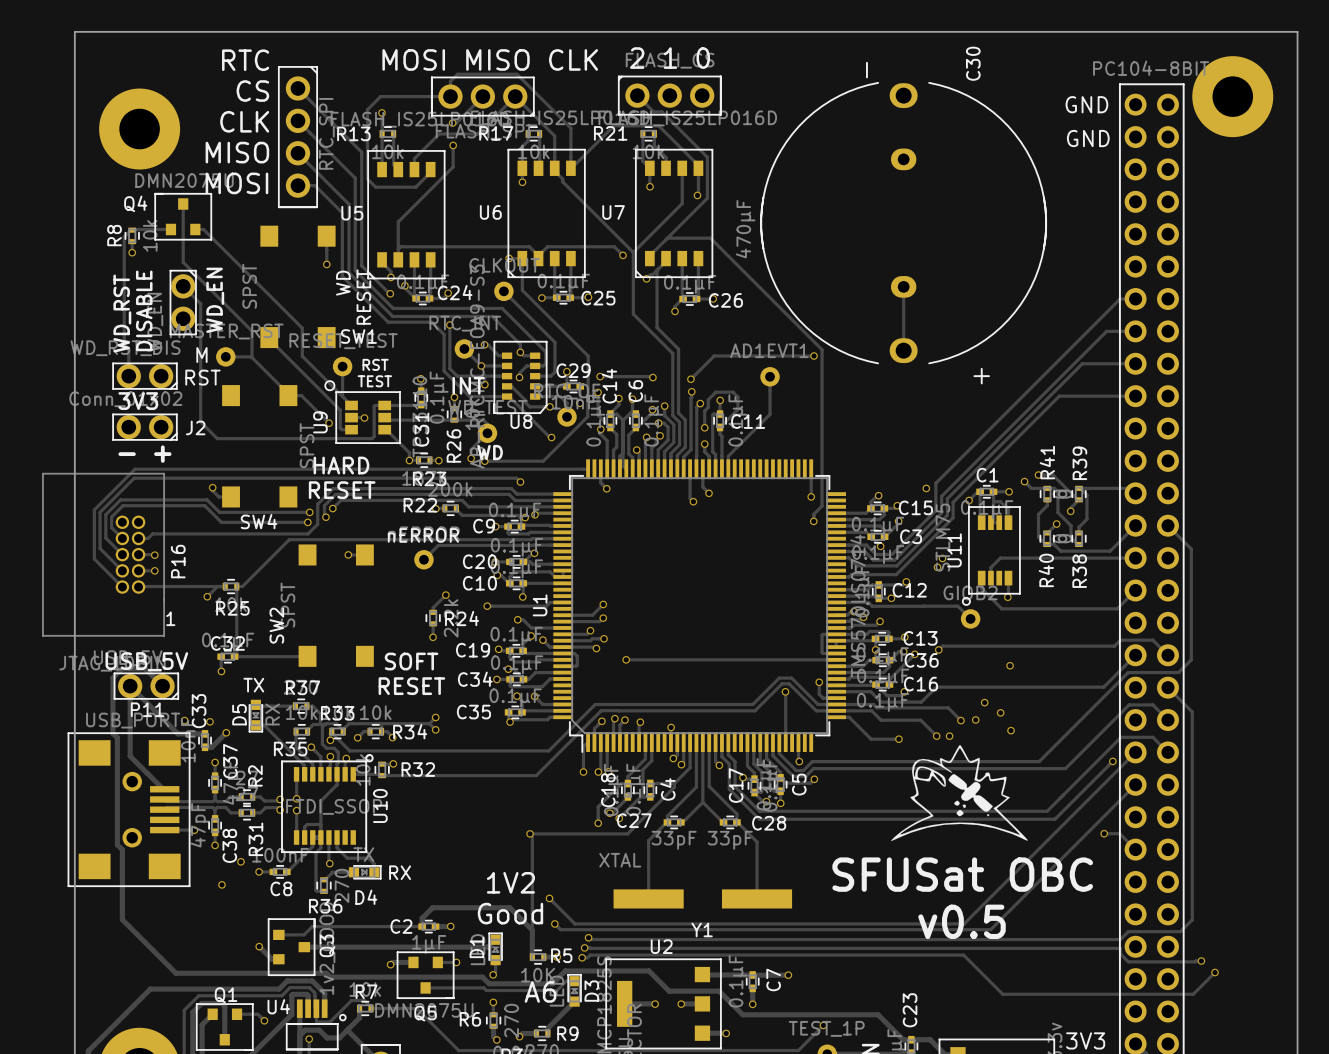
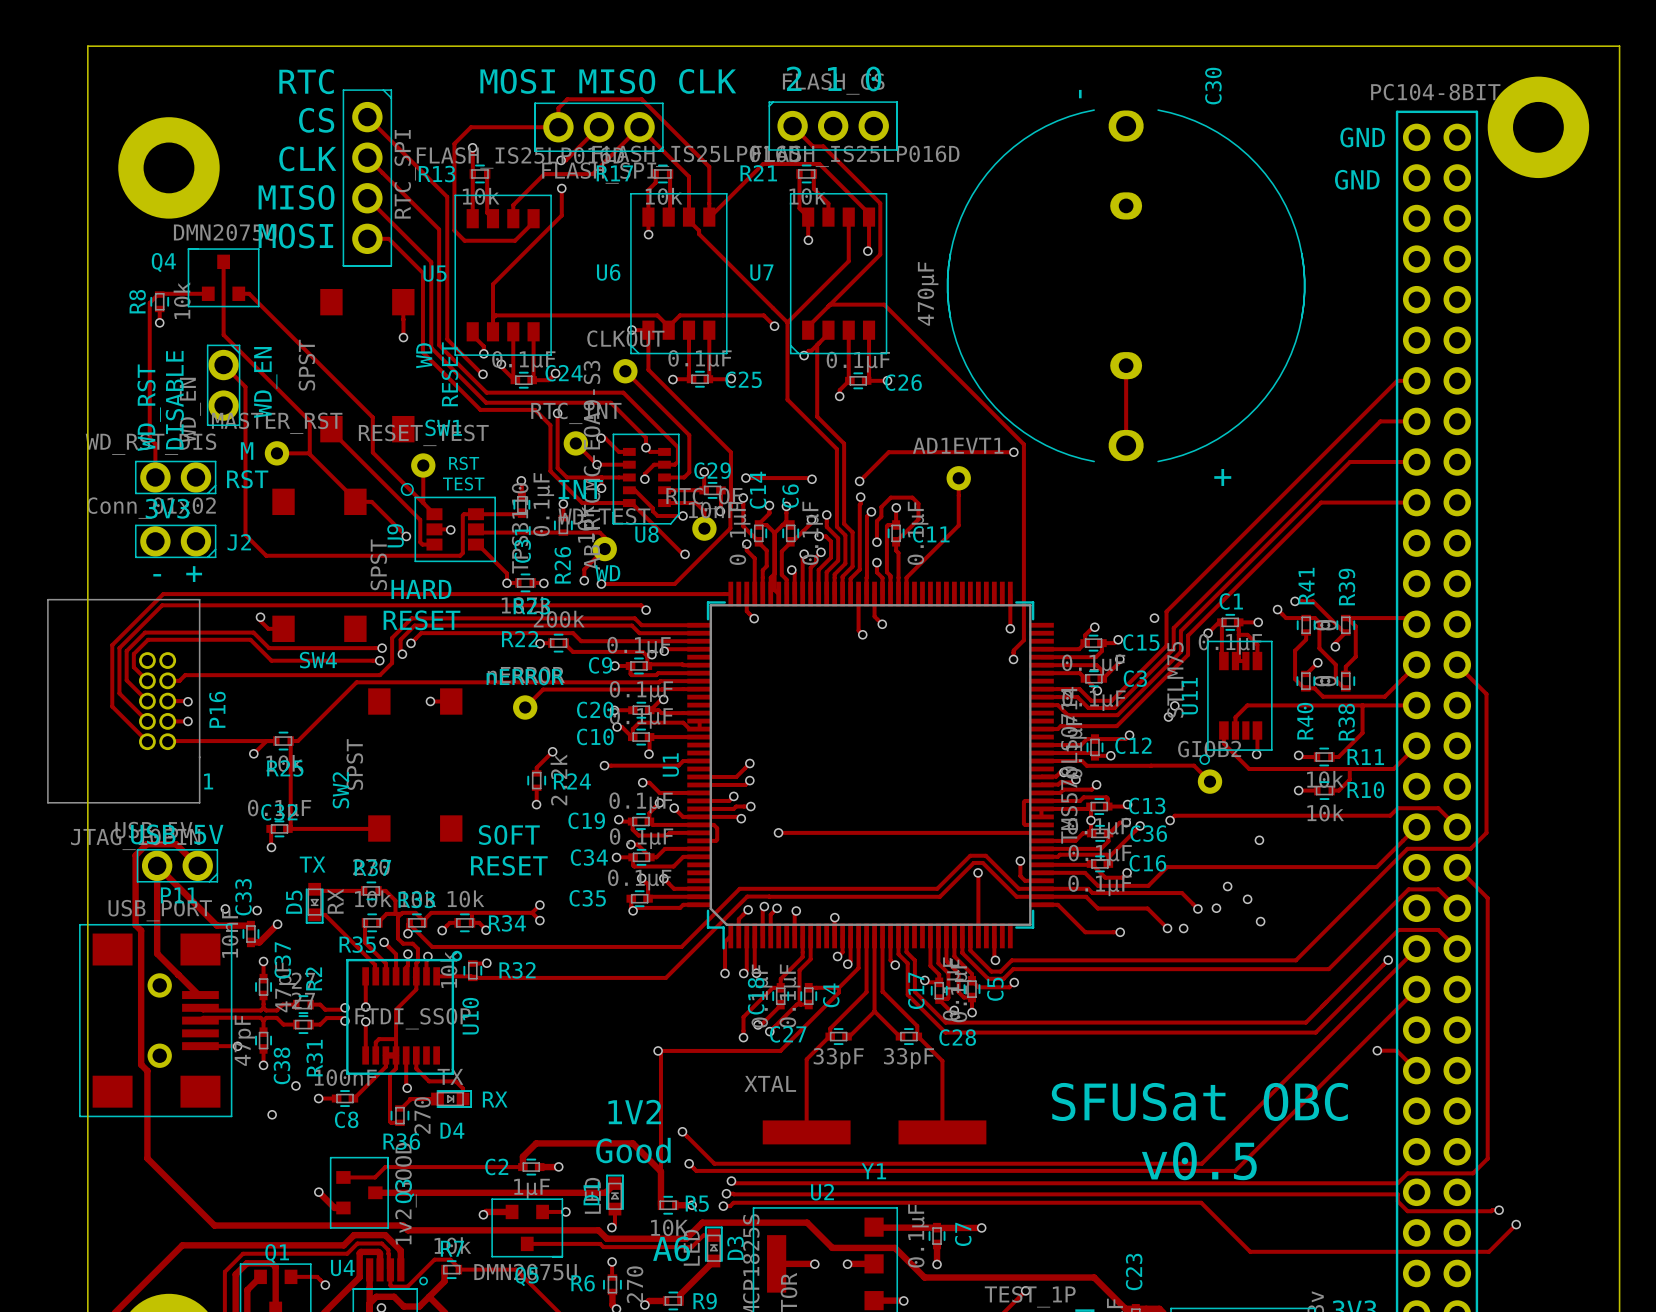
track: none -> (1362, 705) (1362, 733) (1338, 757) (1331, 757)
track: none -> (1298, 755) (1317, 757)
via: none -> (1298, 755)
R11: none -> 10k (1324, 757)
track: none -> (1349, 769) (1349, 779) (1338, 790) (1331, 790)
track: none -> (1298, 790) (1317, 790)
via: none -> (1298, 790)
R10: none -> 10k (1324, 790)
drawing: [891, 744, 1028, 842] -> none

